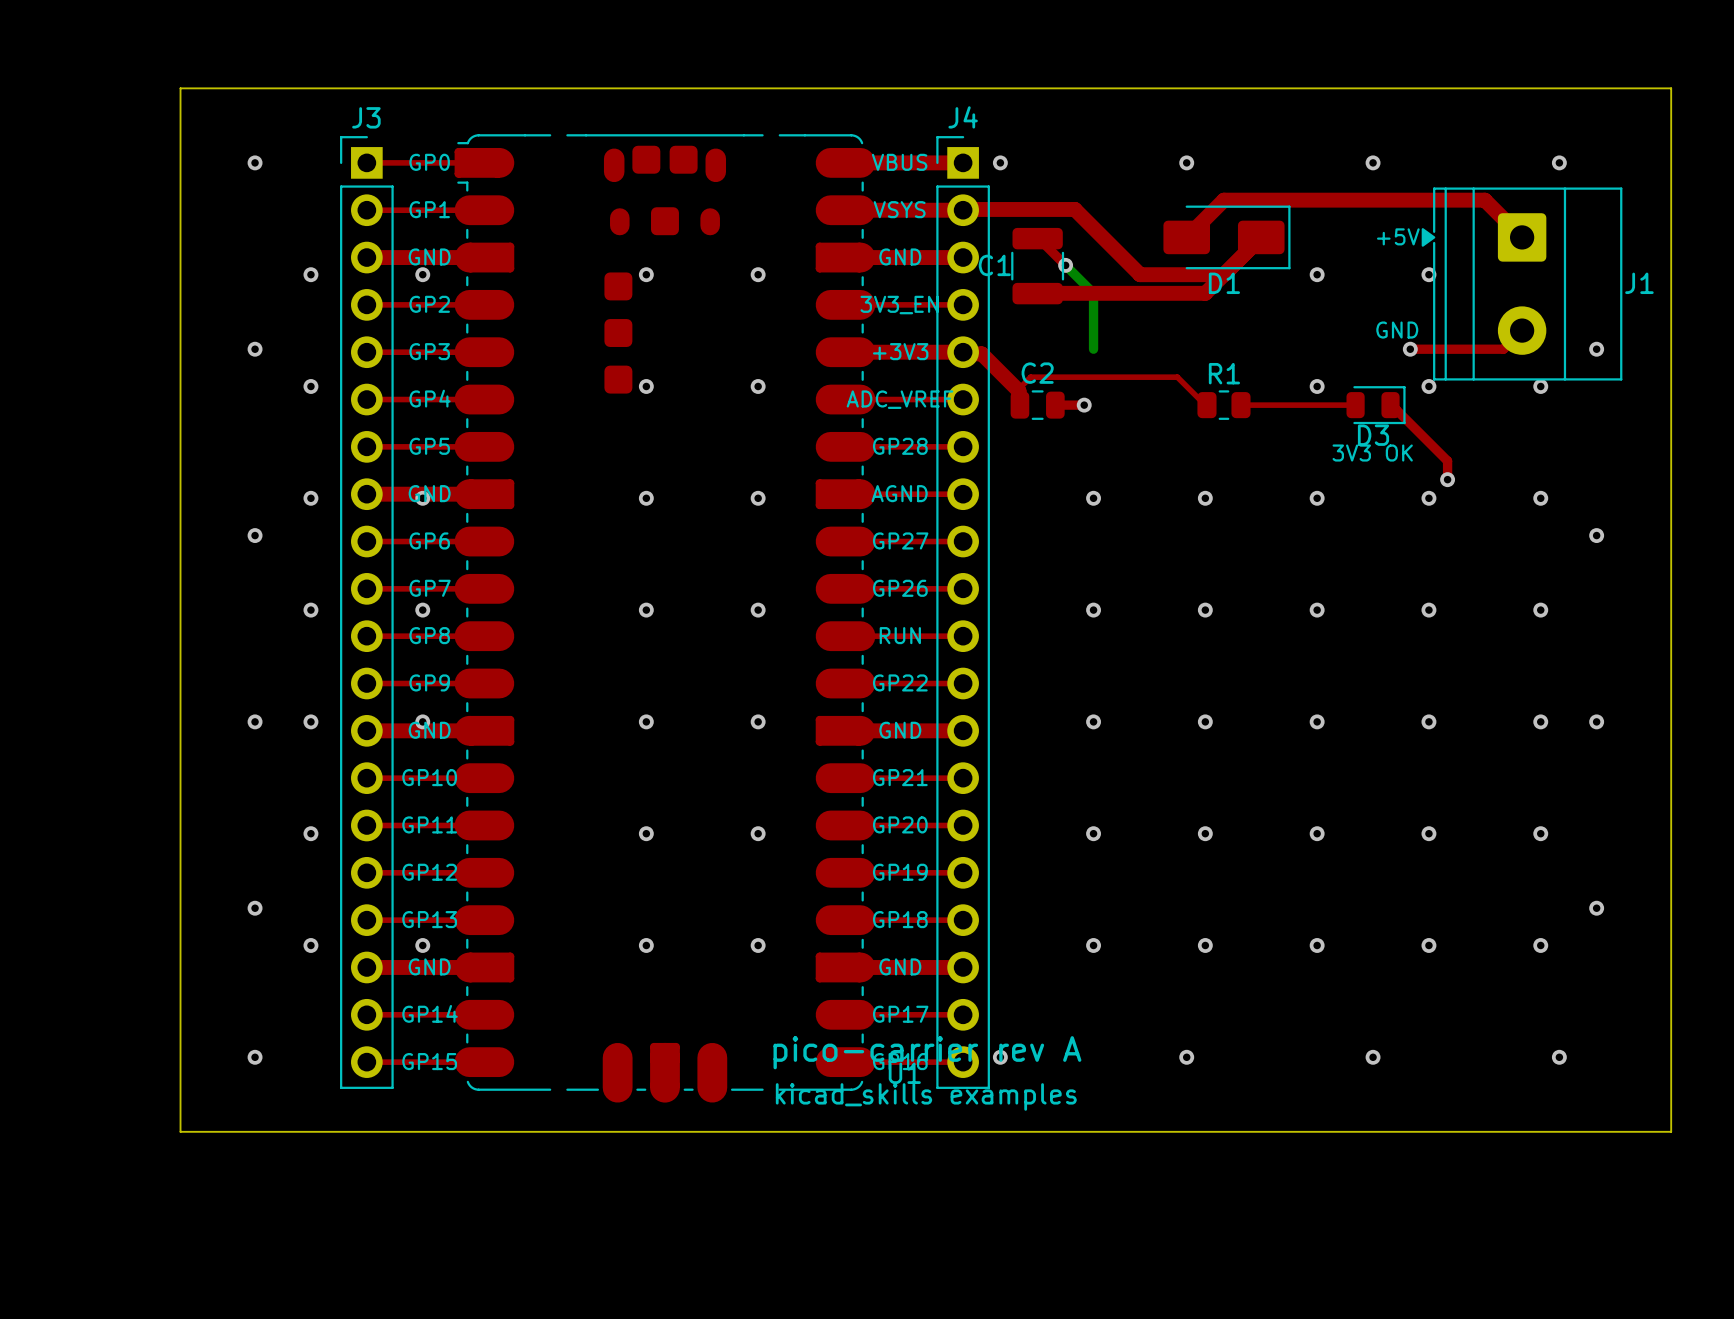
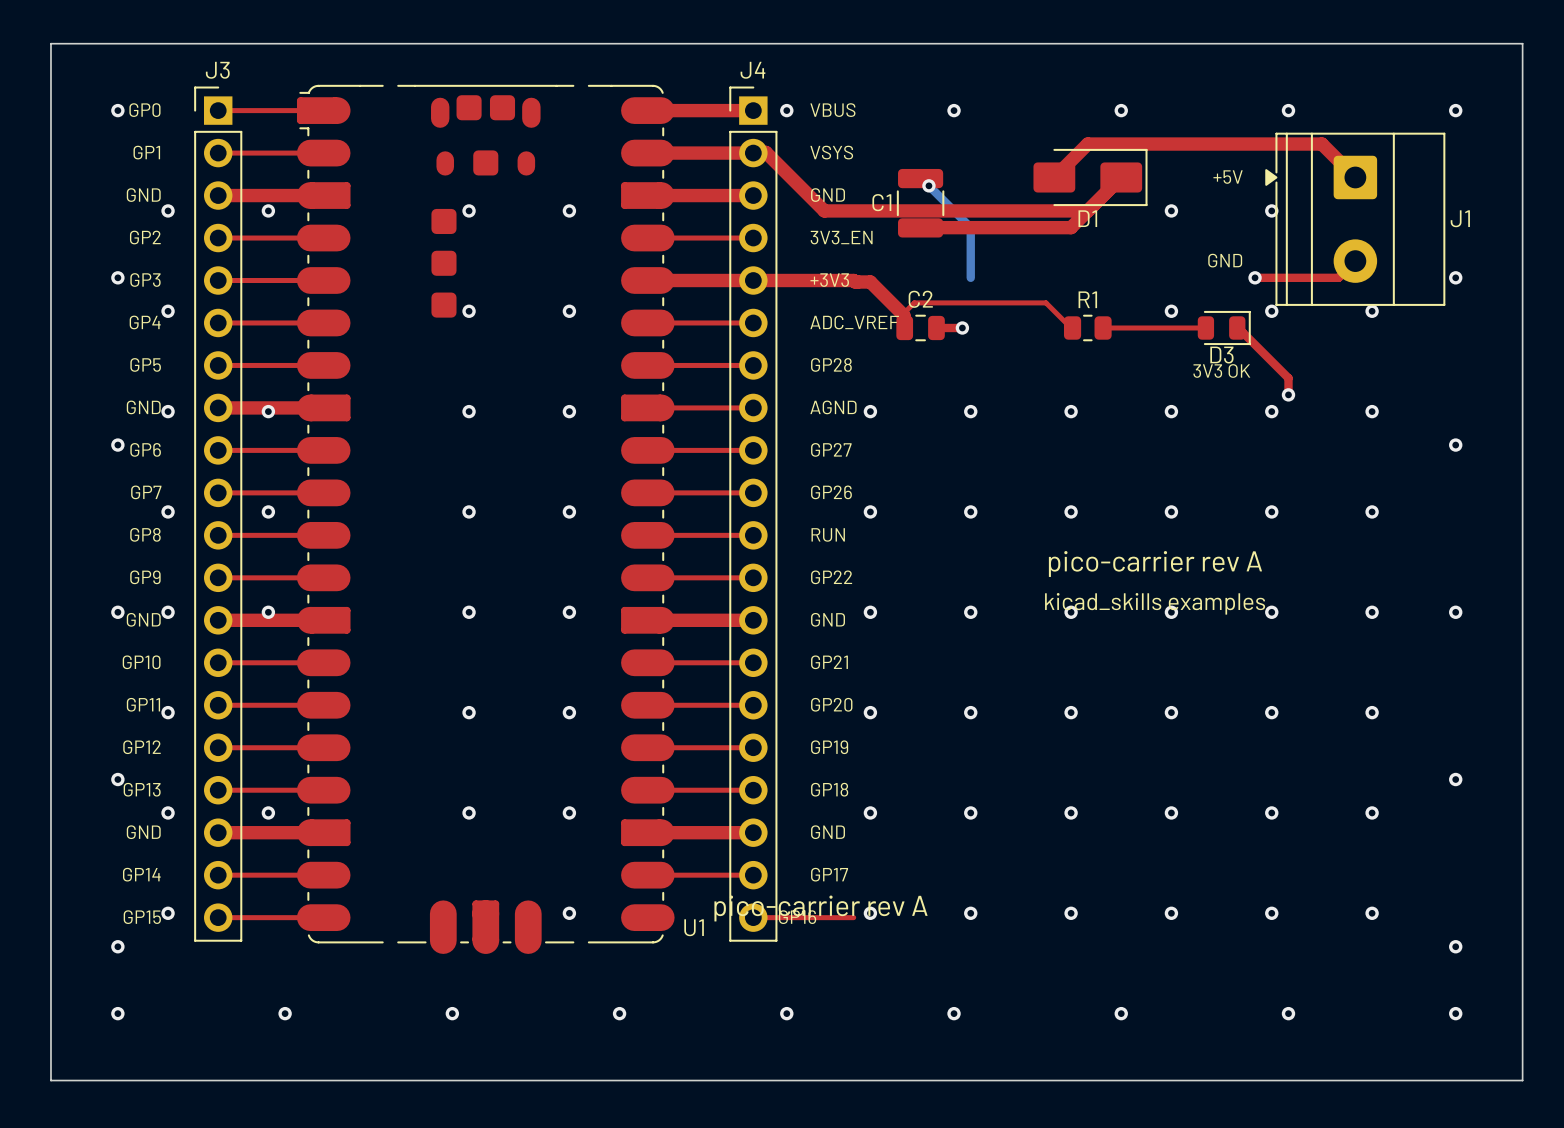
board edge: (180, 88) (180, 1131) (1671, 1131) (1671, 88) -> (151, 43) (50, 43) (50, 1080) (1522, 1080) (1522, 43) (1489, 43)
via: none -> (117, 110)
via: (255, 162) -> none
top track: (372, 162) (484, 162) -> (218, 110) (318, 110)
text position: GP0 (429, 162) -> GP0 (144, 110)
top track: (851, 162) (963, 162) -> (647, 110) (748, 110)
via: none -> (786, 110)
text position: VBUS (899, 162) -> VBUS (832, 110)
via: (1000, 162) -> none
via: none -> (954, 110)
via: (1186, 162) -> none
via: none -> (1121, 110)
via: (1373, 162) -> none
via: none -> (1288, 110)
via: (1559, 162) -> none
via: none -> (1455, 110)
text position: GP1 (429, 209) -> GP1 (146, 152)
text position: VSYS (899, 209) -> VSYS (831, 152)
top track: (372, 210) (484, 210) -> (218, 153) (318, 153)
top track: none -> (647, 153) (748, 153)
top track: (851, 210) (1074, 209) (1140, 274) -> (753, 153) (765, 152) (824, 210) (1012, 210)
text position: +5V (1398, 236) -> +5V (1228, 177)
top track: (1046, 246) (1065, 265) -> none
bottom track: none -> (928, 185) (945, 202)
text: none -> GND (143, 195)
text: GND (429, 256) -> none
text position: GND (900, 256) -> GND (828, 195)
top track: (372, 257) (484, 257) -> (218, 195) (318, 195)
top track: (851, 257) (963, 257) -> (647, 195) (748, 195)
via position: (1065, 265) -> (928, 185)
via: none -> (168, 210)
via: (422, 274) -> none
via: none -> (469, 210)
via: (758, 274) -> none
top track: (372, 304) (484, 304) -> (218, 238) (318, 238)
text position: GP2 (429, 304) -> GP2 (145, 237)
top track: (851, 304) (963, 304) -> (647, 238) (748, 238)
text position: 3V3_EN (899, 305) -> 3V3_EN (841, 237)
text position: GND (1397, 330) -> GND (1225, 260)
via: none -> (117, 277)
via: (255, 349) -> none
via position: (1596, 349) -> (1455, 277)
text position: GP3 (429, 351) -> GP3 (145, 280)
text position: +3V3 (900, 351) -> +3V3 (829, 280)
top track: (372, 352) (484, 352) -> (218, 280) (318, 280)
top track: none -> (647, 280) (748, 280)
via: none -> (168, 311)
via: (310, 386) -> none
via: none -> (469, 311)
via: (758, 386) -> none
text position: GP4 (430, 398) -> GP4 (145, 322)
top track: (372, 399) (484, 399) -> (218, 322) (318, 322)
top track: (851, 399) (963, 399) -> (647, 322) (748, 322)
text position: ADC_VREF (899, 399) -> ADC_VREF (854, 322)
top track: (372, 446) (484, 446) -> (218, 365) (318, 365)
text position: GP5 (429, 446) -> GP5 (145, 364)
top track: (851, 446) (963, 446) -> (647, 365) (748, 365)
text position: GP28 (900, 446) -> GP28 (831, 364)
text: none -> GND (143, 407)
text: GND (429, 493) -> none
text position: AGND (899, 493) -> AGND (833, 407)
top track: (372, 494) (484, 494) -> (218, 407) (318, 407)
top track: (851, 494) (963, 494) -> (647, 407) (748, 407)
via: none -> (168, 411)
via: (422, 498) -> none
via: none -> (469, 411)
via: (758, 498) -> none
via: none -> (870, 411)
via: none -> (117, 445)
via: (255, 535) -> none
via position: (1596, 535) -> (1455, 445)
text position: GP6 (429, 540) -> GP6 (145, 449)
text position: GP27 (900, 540) -> GP27 (831, 449)
top track: (372, 541) (484, 541) -> (218, 450) (318, 450)
top track: (851, 541) (963, 541) -> (647, 450) (748, 450)
top track: (372, 588) (484, 588) -> (218, 492) (318, 492)
text position: GP7 (430, 588) -> GP7 (146, 492)
top track: (851, 588) (963, 588) -> (647, 492) (748, 492)
text position: GP26 (900, 588) -> GP26 (831, 492)
via: none -> (168, 511)
via: (422, 610) -> none
via: none -> (469, 511)
via: (758, 610) -> none
via: none -> (870, 511)
J3 position: (366, 612) -> (218, 514)
J4 position: (963, 612) -> (753, 514)
U1 position: (664, 618) -> (485, 519)
text position: GP8 (429, 635) -> GP8 (145, 534)
text position: RUN (900, 635) -> RUN (828, 534)
top track: (372, 636) (484, 636) -> (218, 535) (318, 535)
top track: (851, 636) (963, 636) -> (647, 535) (748, 535)
text: none -> pico-carrier rev A (1155, 564)
text position: GP9 (429, 682) -> GP9 (145, 577)
text position: GP22 (900, 682) -> GP22 (831, 577)
top track: (372, 683) (484, 683) -> (218, 577) (318, 577)
top track: (851, 683) (963, 683) -> (647, 577) (748, 577)
text: none -> kicad_skills examples (1155, 603)
via: none -> (117, 612)
via: none -> (168, 612)
via: (255, 721) -> none
via: (422, 721) -> none
via: none -> (469, 612)
via: (758, 721) -> none
via: none -> (870, 612)
via position: (1596, 721) -> (1455, 612)
text: none -> GND (143, 619)
top track: (372, 730) (484, 730) -> (218, 620) (318, 620)
text: GND (429, 730) -> none
top track: (851, 730) (963, 730) -> (647, 620) (748, 620)
text position: GND (900, 730) -> GND (828, 619)
text position: GP10 (429, 777) -> GP10 (141, 662)
text position: GP21 (900, 777) -> GP21 (829, 662)
top track: (372, 778) (484, 778) -> (218, 662) (318, 662)
top track: (851, 778) (963, 778) -> (647, 662) (748, 662)
text position: GP11 (429, 824) -> GP11 (143, 704)
text position: GP20 (900, 824) -> GP20 (831, 704)
top track: (372, 825) (484, 825) -> (218, 705) (318, 705)
top track: (851, 825) (963, 825) -> (647, 705) (748, 705)
via: none -> (168, 712)
via: (310, 833) -> none
via: none -> (469, 712)
via: (758, 833) -> none
via: none -> (870, 712)
top track: (372, 872) (484, 872) -> (218, 747) (318, 747)
text position: GP12 (429, 872) -> GP12 (142, 747)
top track: (851, 872) (963, 872) -> (647, 747) (748, 747)
text position: GP19 (900, 872) -> GP19 (829, 747)
via: none -> (117, 779)
via: (255, 908) -> none
via position: (1596, 908) -> (1455, 779)
text position: GP13 (429, 919) -> GP13 (142, 789)
text position: GP18 (900, 919) -> GP18 (829, 789)
top track: (372, 920) (484, 920) -> (218, 790) (318, 790)
top track: (851, 920) (963, 920) -> (647, 790) (748, 790)
via: none -> (168, 812)
via: (422, 945) -> none
via: none -> (469, 812)
via: (758, 945) -> none
via: none -> (870, 812)
text: none -> GND (143, 832)
text: GND (429, 966) -> none
text position: GND (900, 966) -> GND (828, 832)
top track: (372, 967) (484, 967) -> (218, 832) (318, 832)
top track: (851, 967) (963, 967) -> (647, 832) (748, 832)
text position: GP14 (430, 1013) -> GP14 (141, 874)
top track: (372, 1014) (484, 1014) -> (218, 875) (318, 875)
top track: (851, 1014) (963, 1014) -> (647, 875) (748, 875)
text position: GP17 (900, 1014) -> GP17 (829, 874)
via position: (255, 1057) -> (168, 913)
via: none -> (569, 913)
via position: (1000, 1057) -> (870, 913)
via: none -> (970, 913)
via position: (1186, 1057) -> (1071, 913)
via: none -> (1171, 913)
via: (1373, 1057) -> none
via: none -> (1271, 913)
via position: (1559, 1057) -> (1372, 913)
text position: GP15 (429, 1061) -> GP15 (142, 917)
top track: (372, 1062) (484, 1062) -> (218, 917) (318, 917)
via: none -> (117, 946)
via: none -> (1455, 946)
text: kicad_skills examples (926, 1096) -> none
via: none -> (117, 1013)
via: none -> (285, 1013)
via: none -> (452, 1013)
via: none -> (619, 1013)
via: none -> (786, 1013)
via: none -> (954, 1013)
via: none -> (1121, 1013)
via: none -> (1288, 1013)
via: none -> (1455, 1013)

